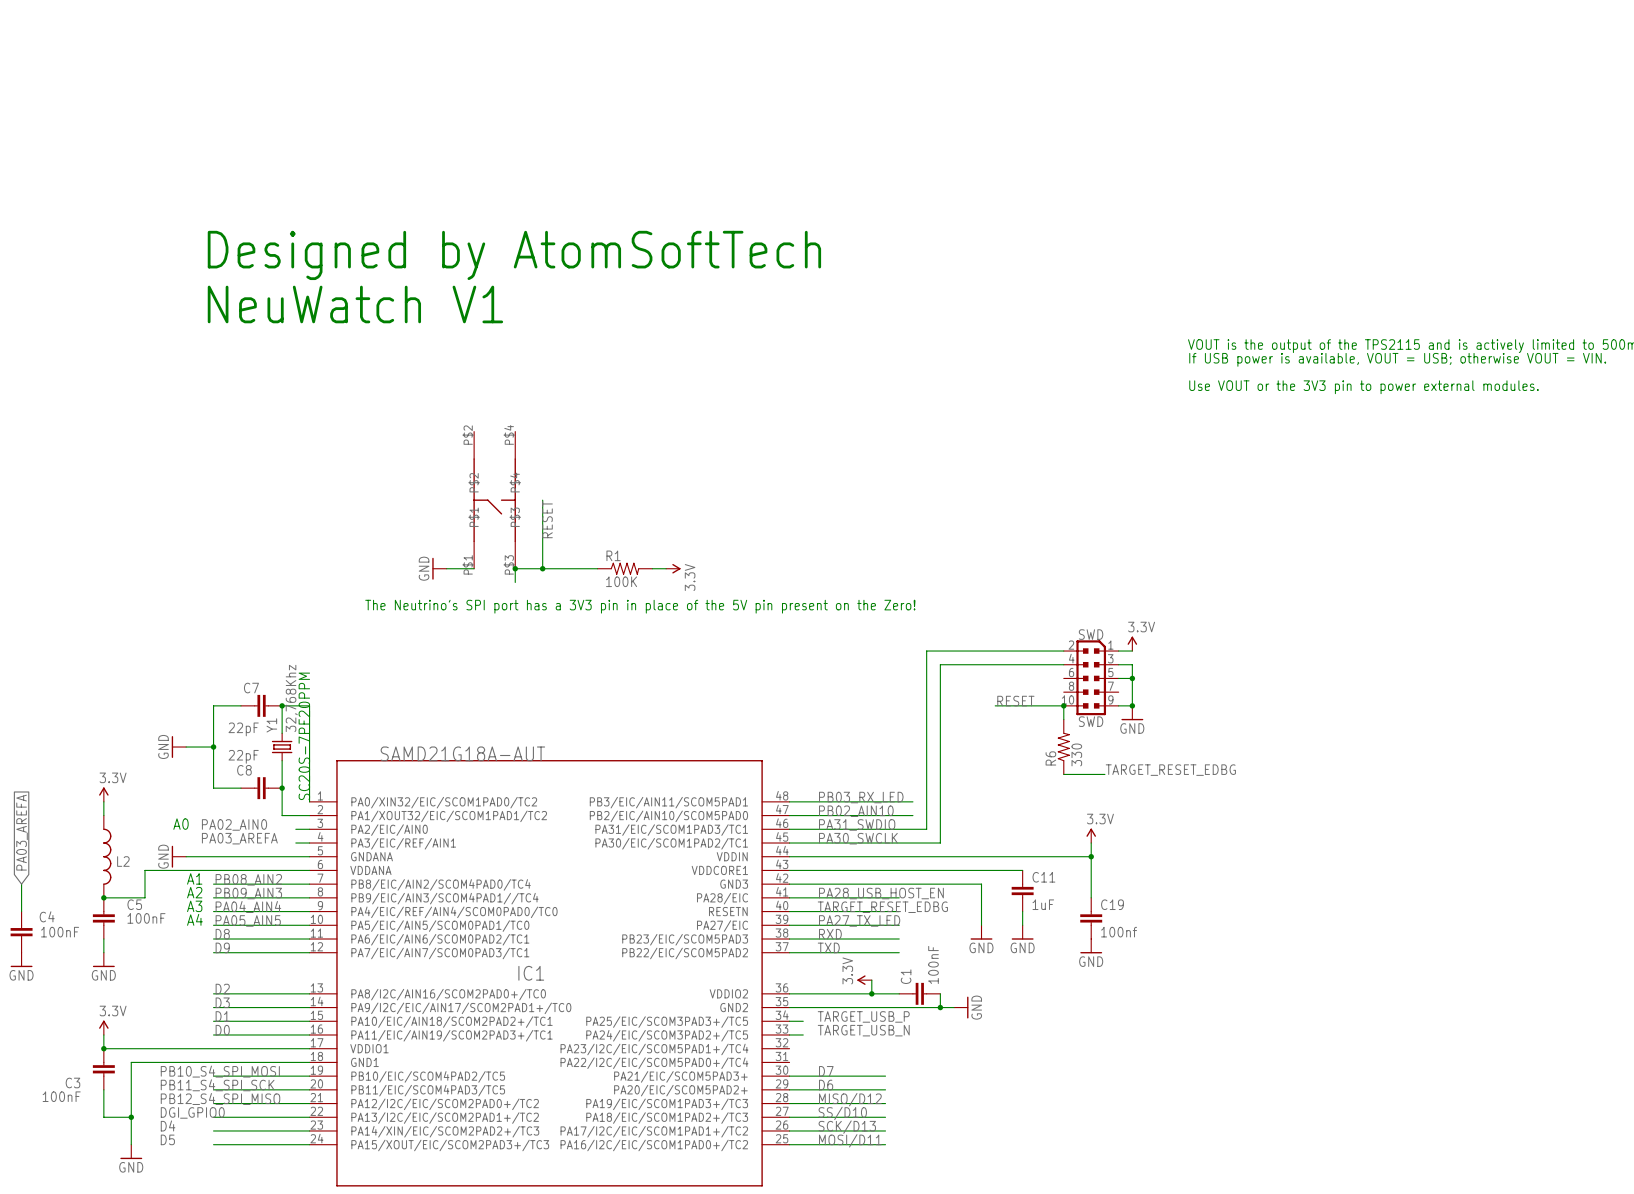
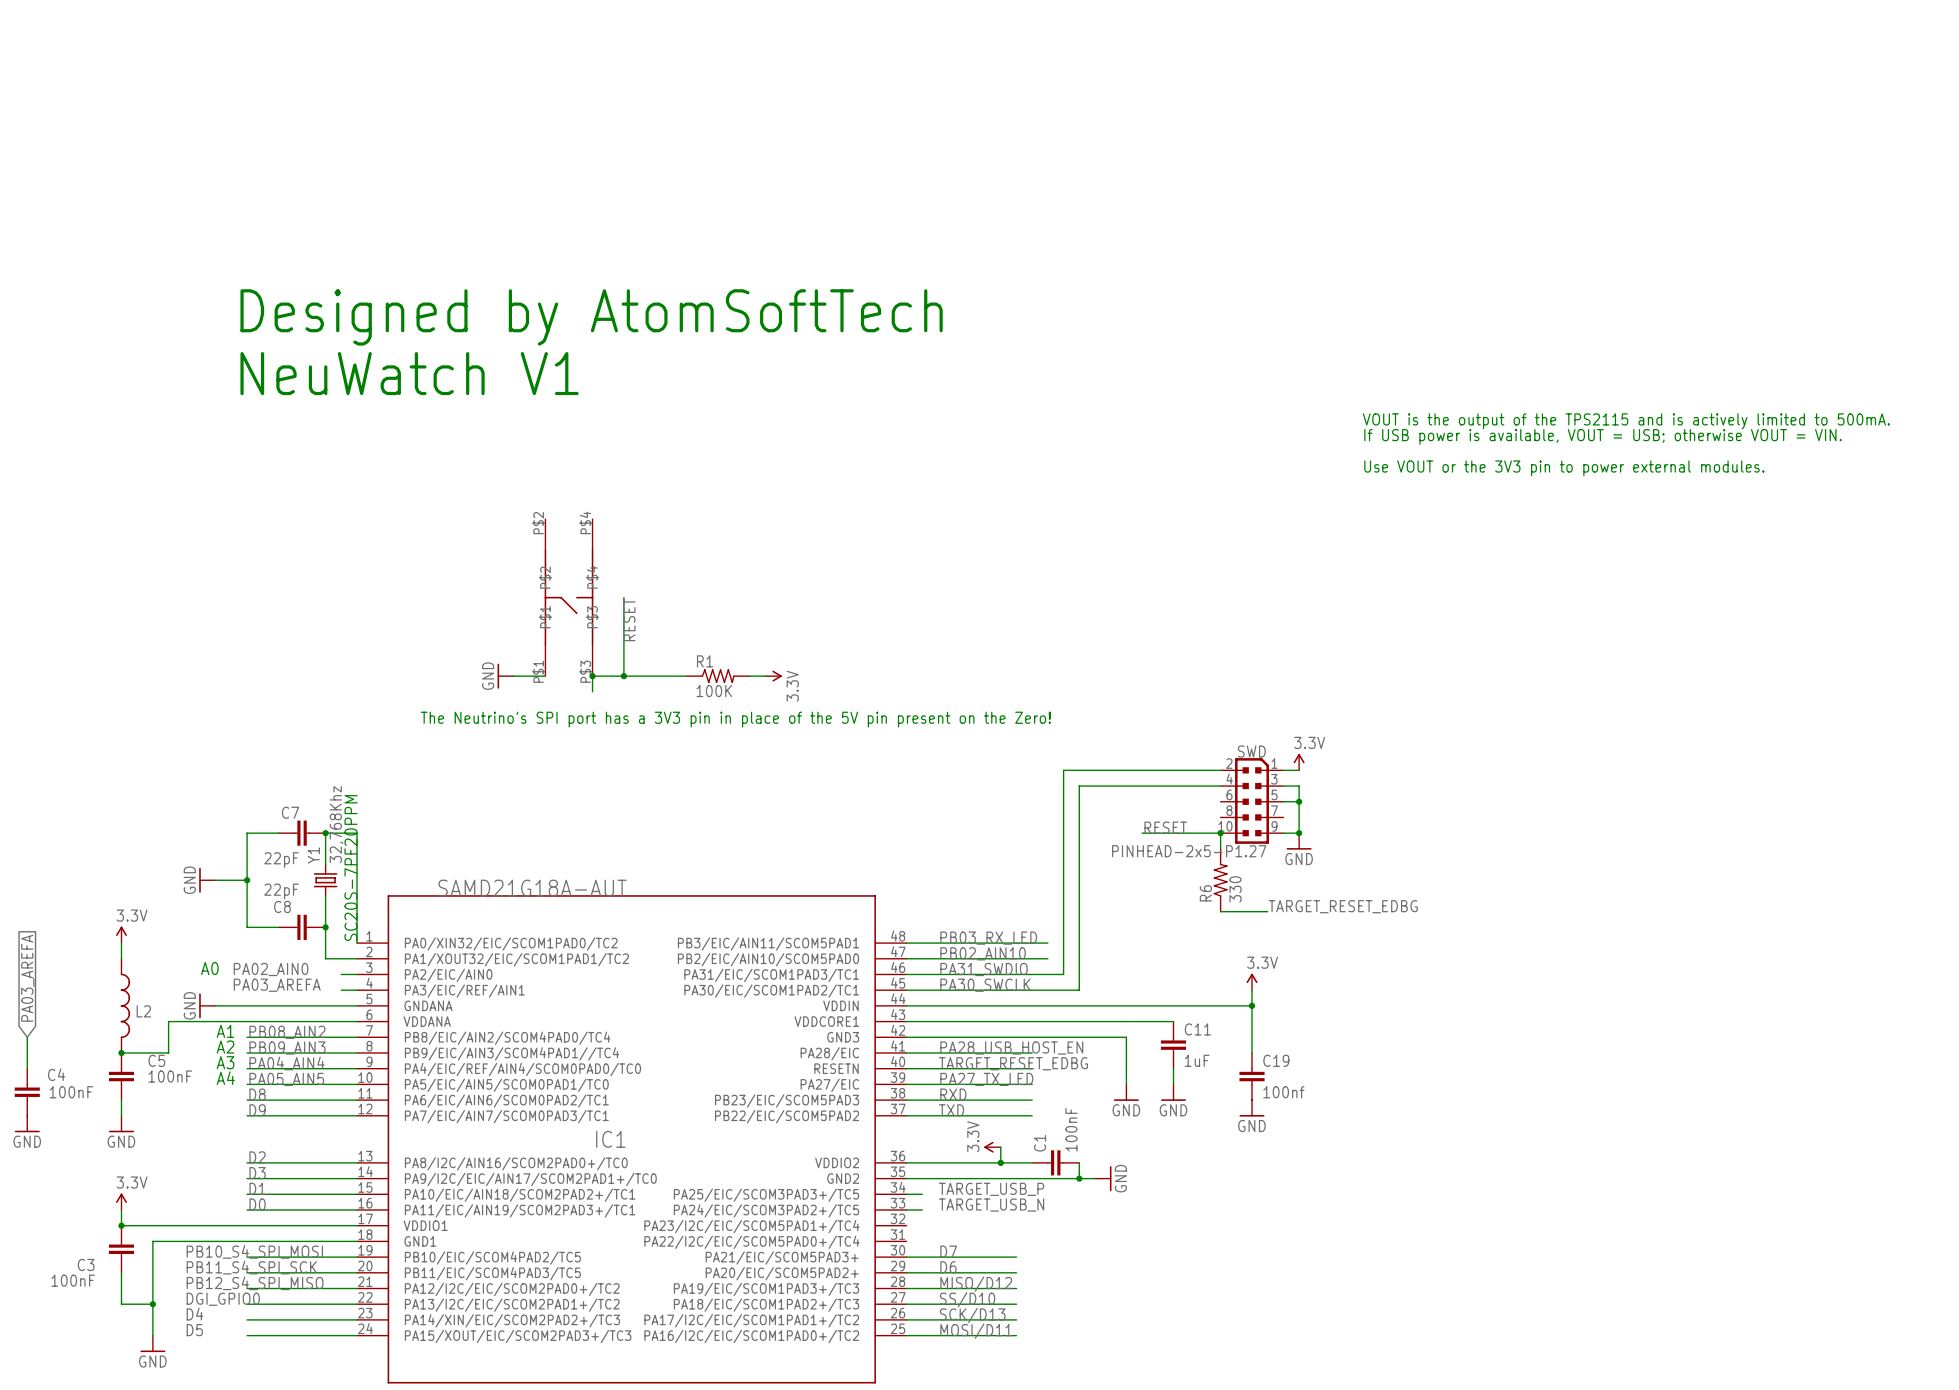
SWD value: SWD (1091, 721) -> PINHEAD-2x5-P1.27 (1189, 851)

